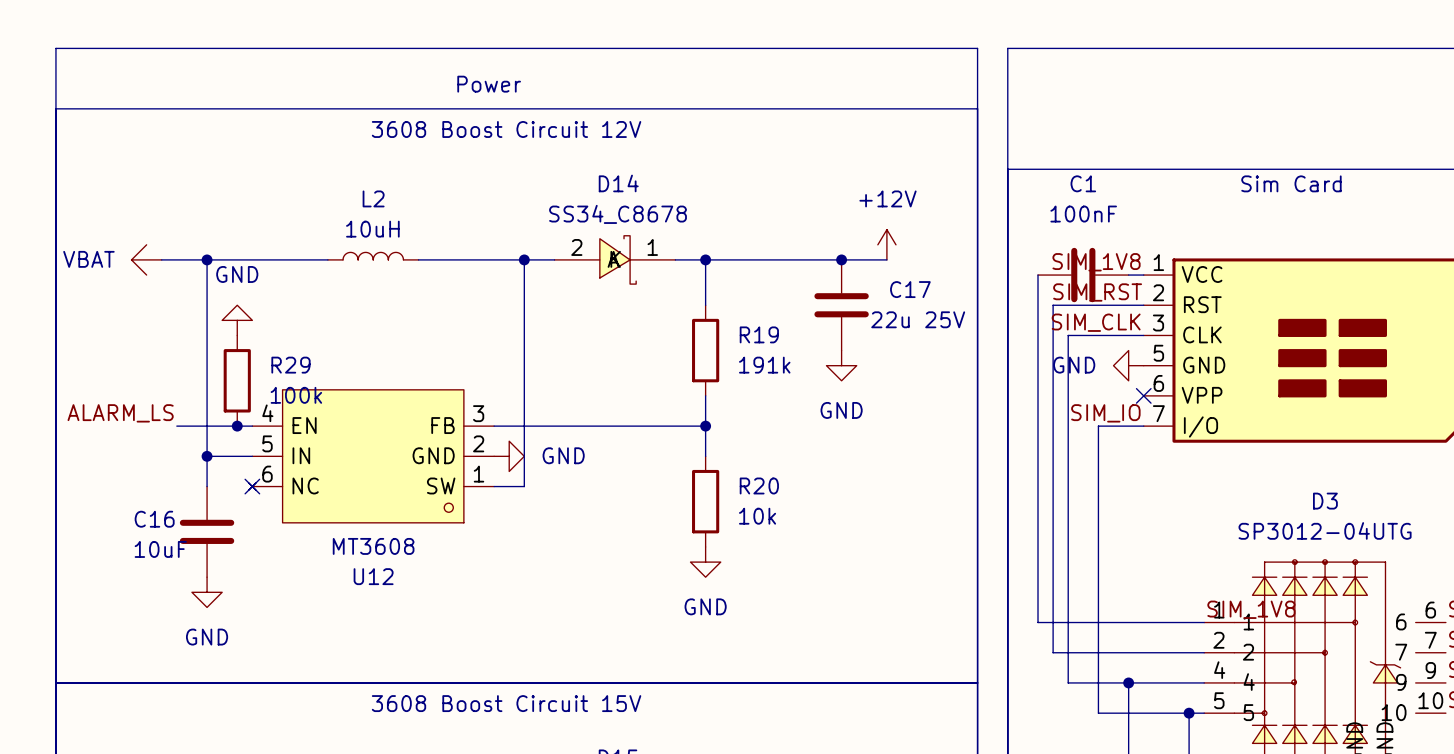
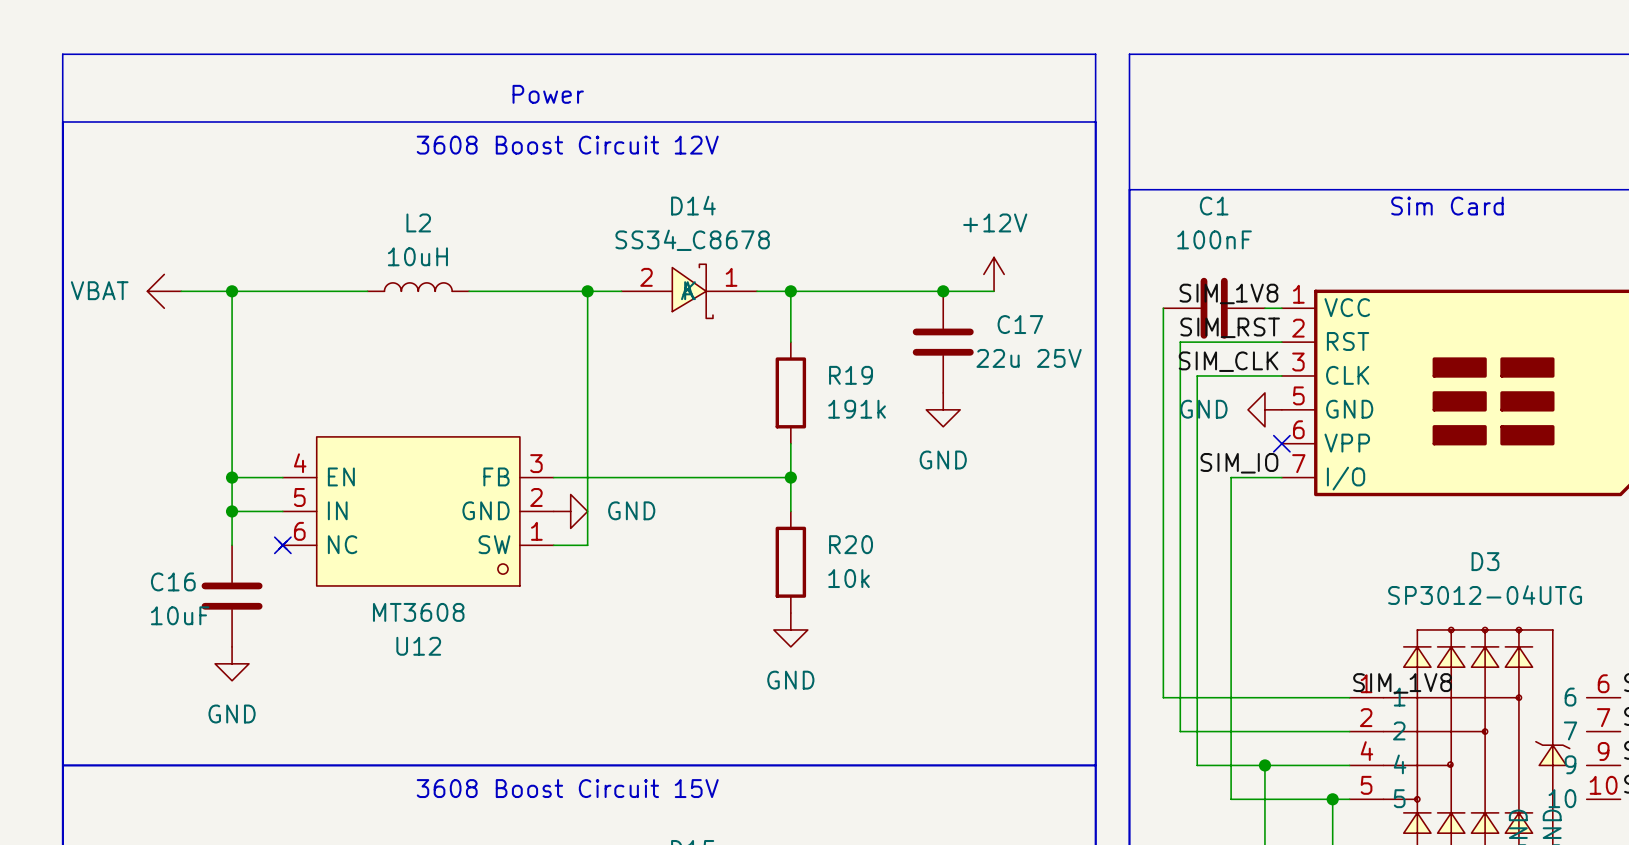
power symbol: GND (237, 320) -> none
R29: 100k (237, 380) -> none
label: ALARM_LS (120, 413) -> none
wire: (176, 426) (207, 426) -> none
junction position: (237, 426) -> (232, 477)

